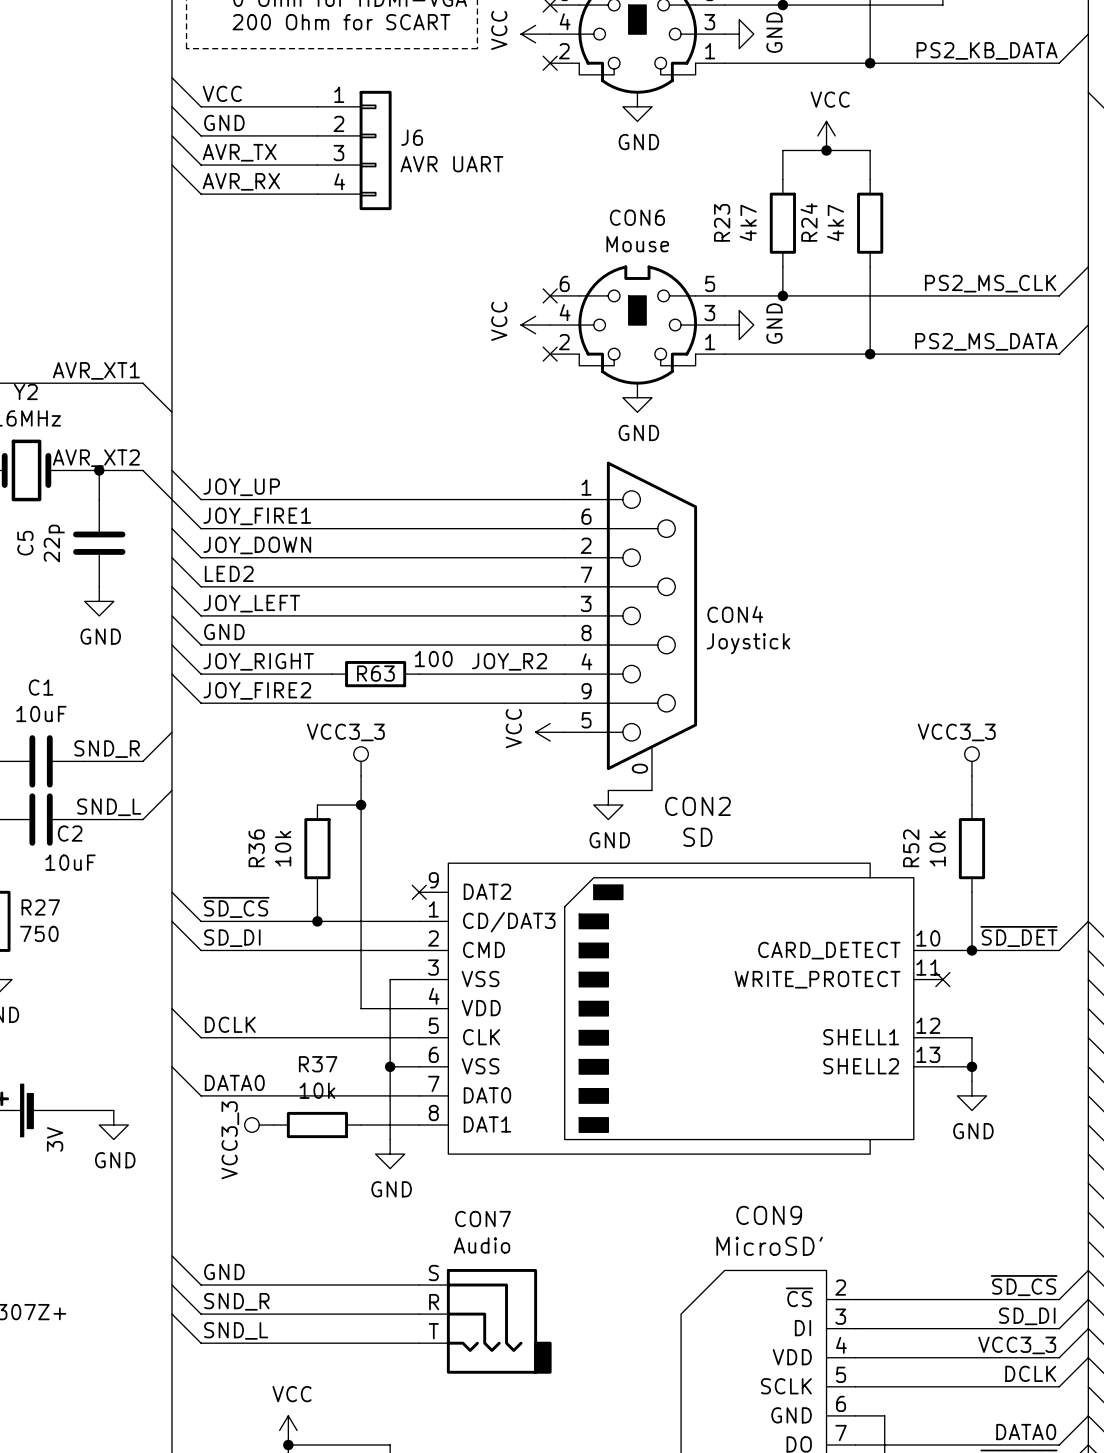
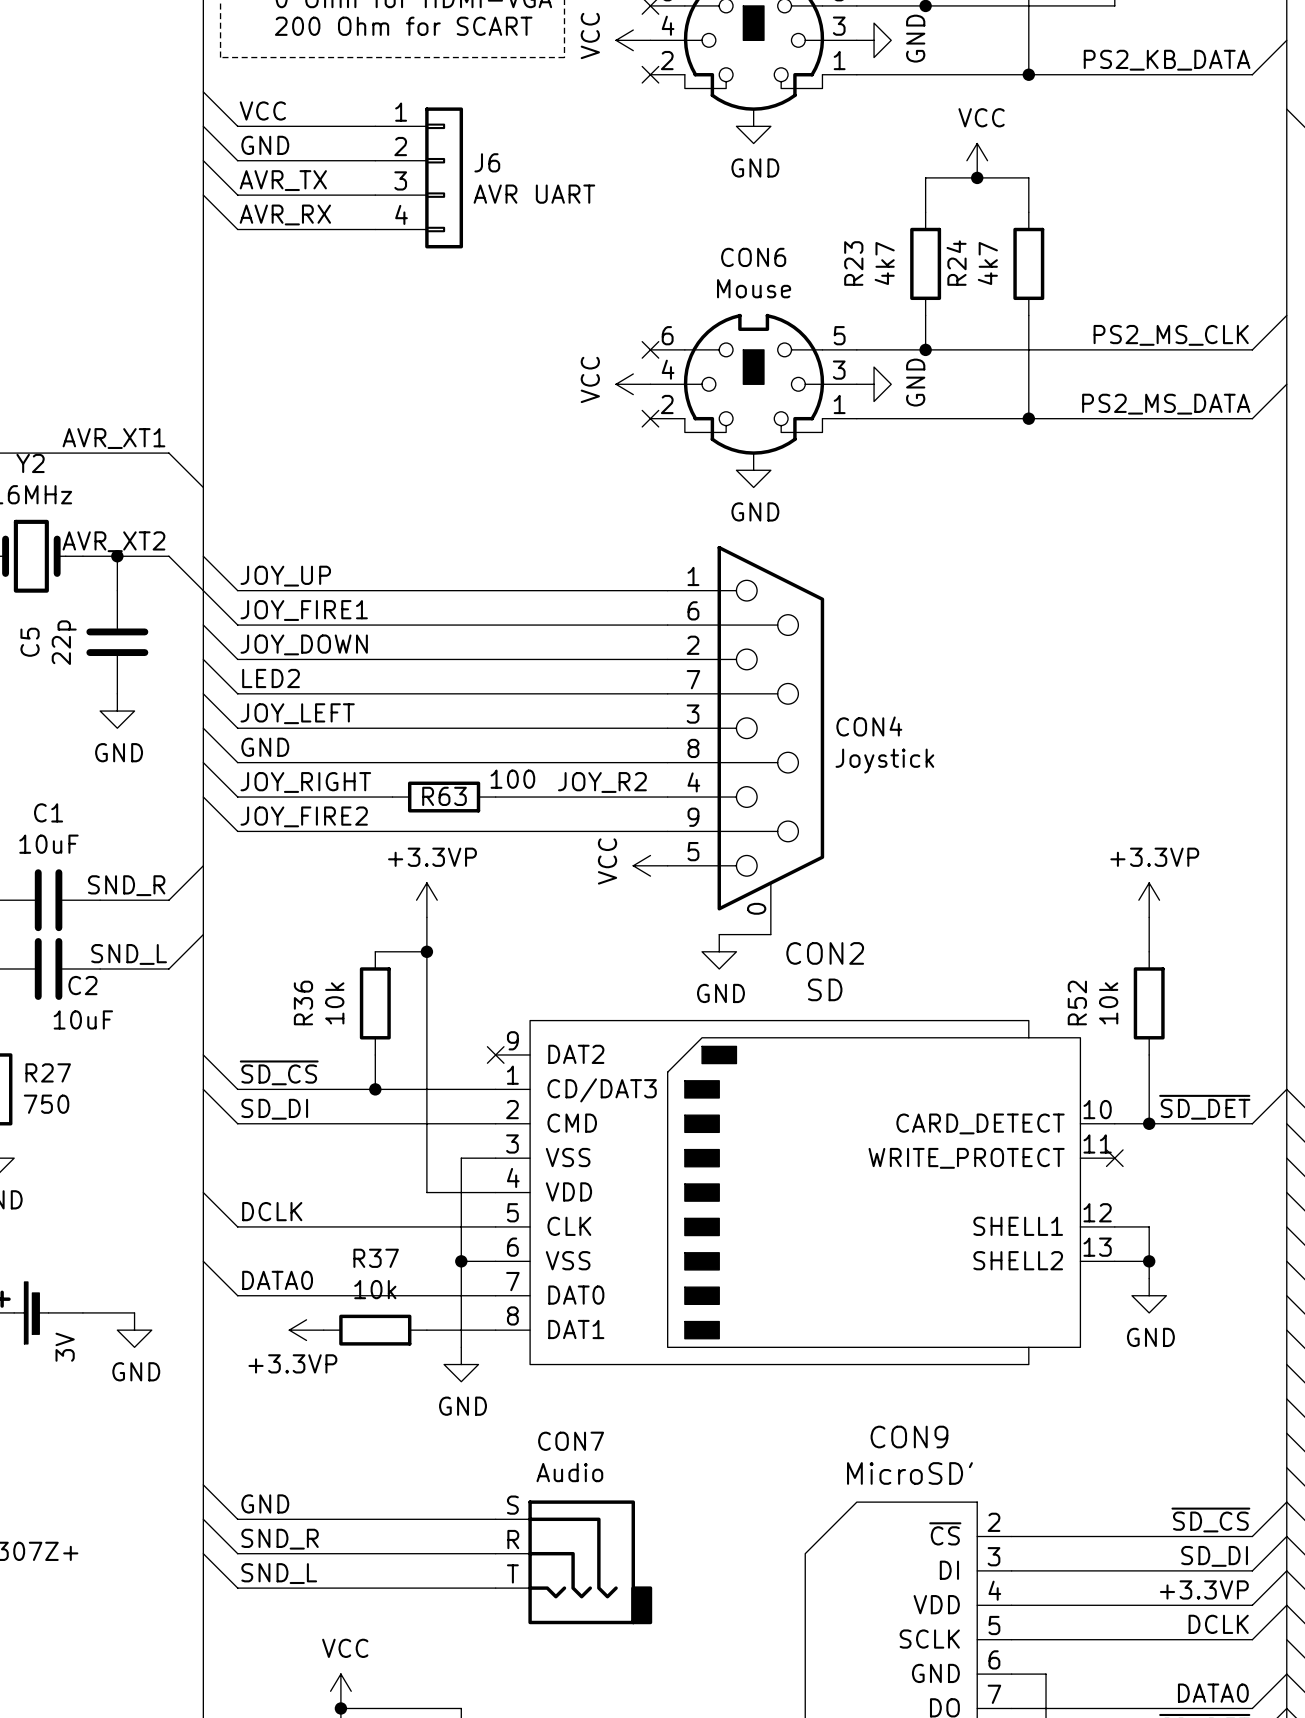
power symbol: VCC3_3 (361, 761) -> +3.3VP (426, 900)
power symbol: VCC3_3 (971, 761) -> +3.3VP (1149, 900)
power symbol: VCC3_3 (259, 1125) -> +3.3VP (306, 1330)
label: VCC3_3 (1017, 1345) -> +3.3VP (1204, 1589)

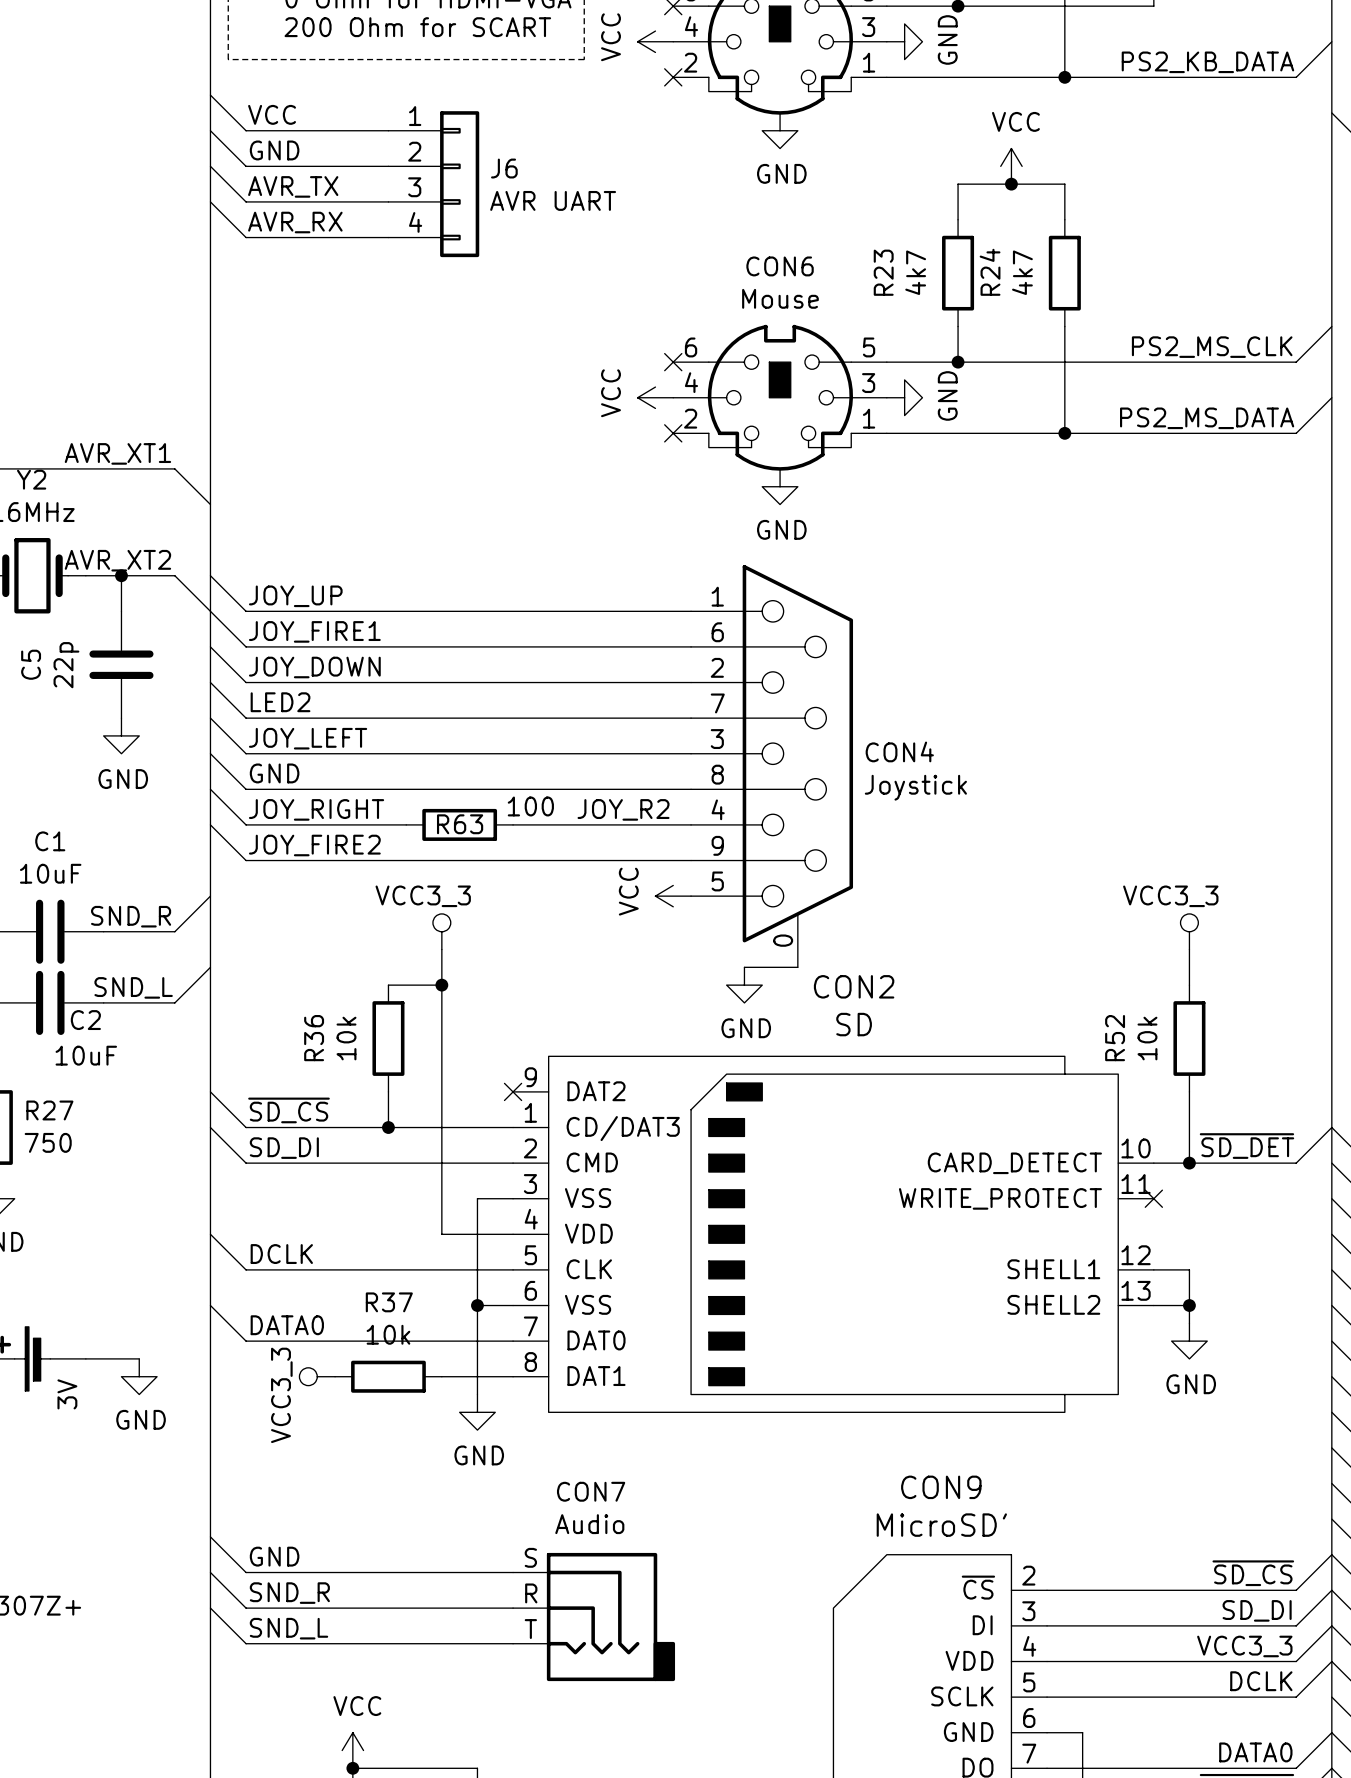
power symbol: +3.3VP (426, 900) -> VCC3_3 (441, 931)
power symbol: +3.3VP (1149, 900) -> VCC3_3 (1189, 931)
power symbol: +3.3VP (306, 1330) -> VCC3_3 (317, 1376)
label: +3.3VP (1204, 1589) -> VCC3_3 (1244, 1646)

